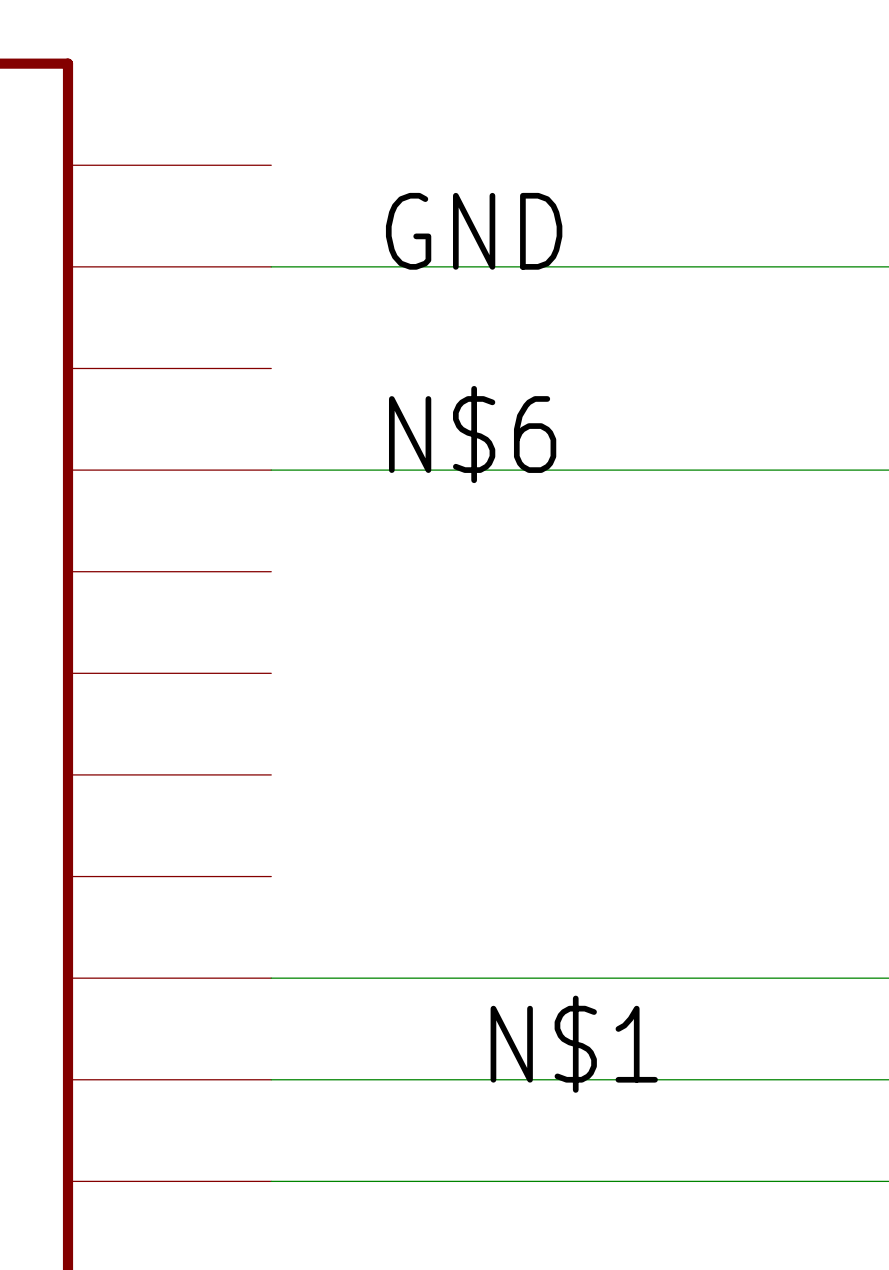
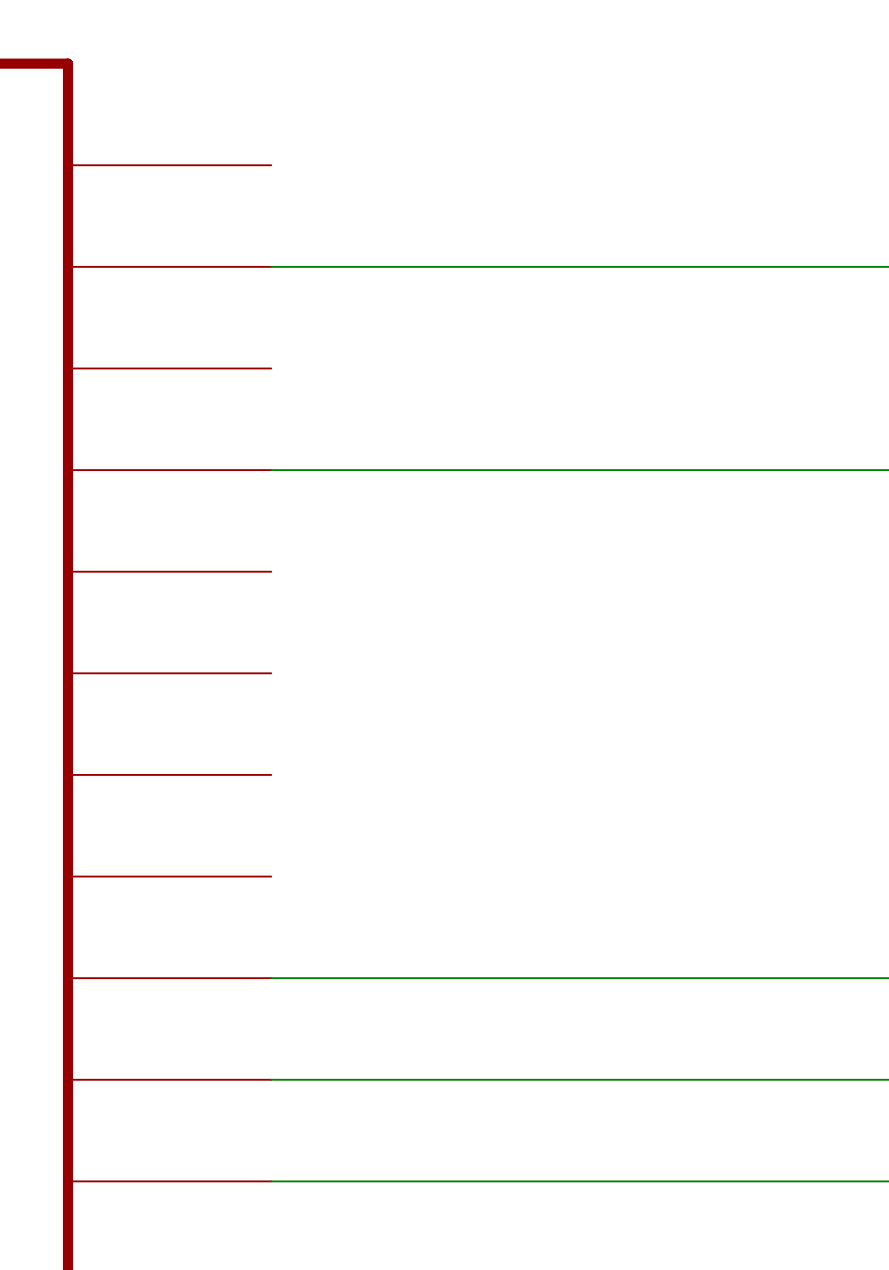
label: GND (474, 231) -> none
label: N$6 (472, 434) -> none
label: N$1 (574, 1044) -> none

